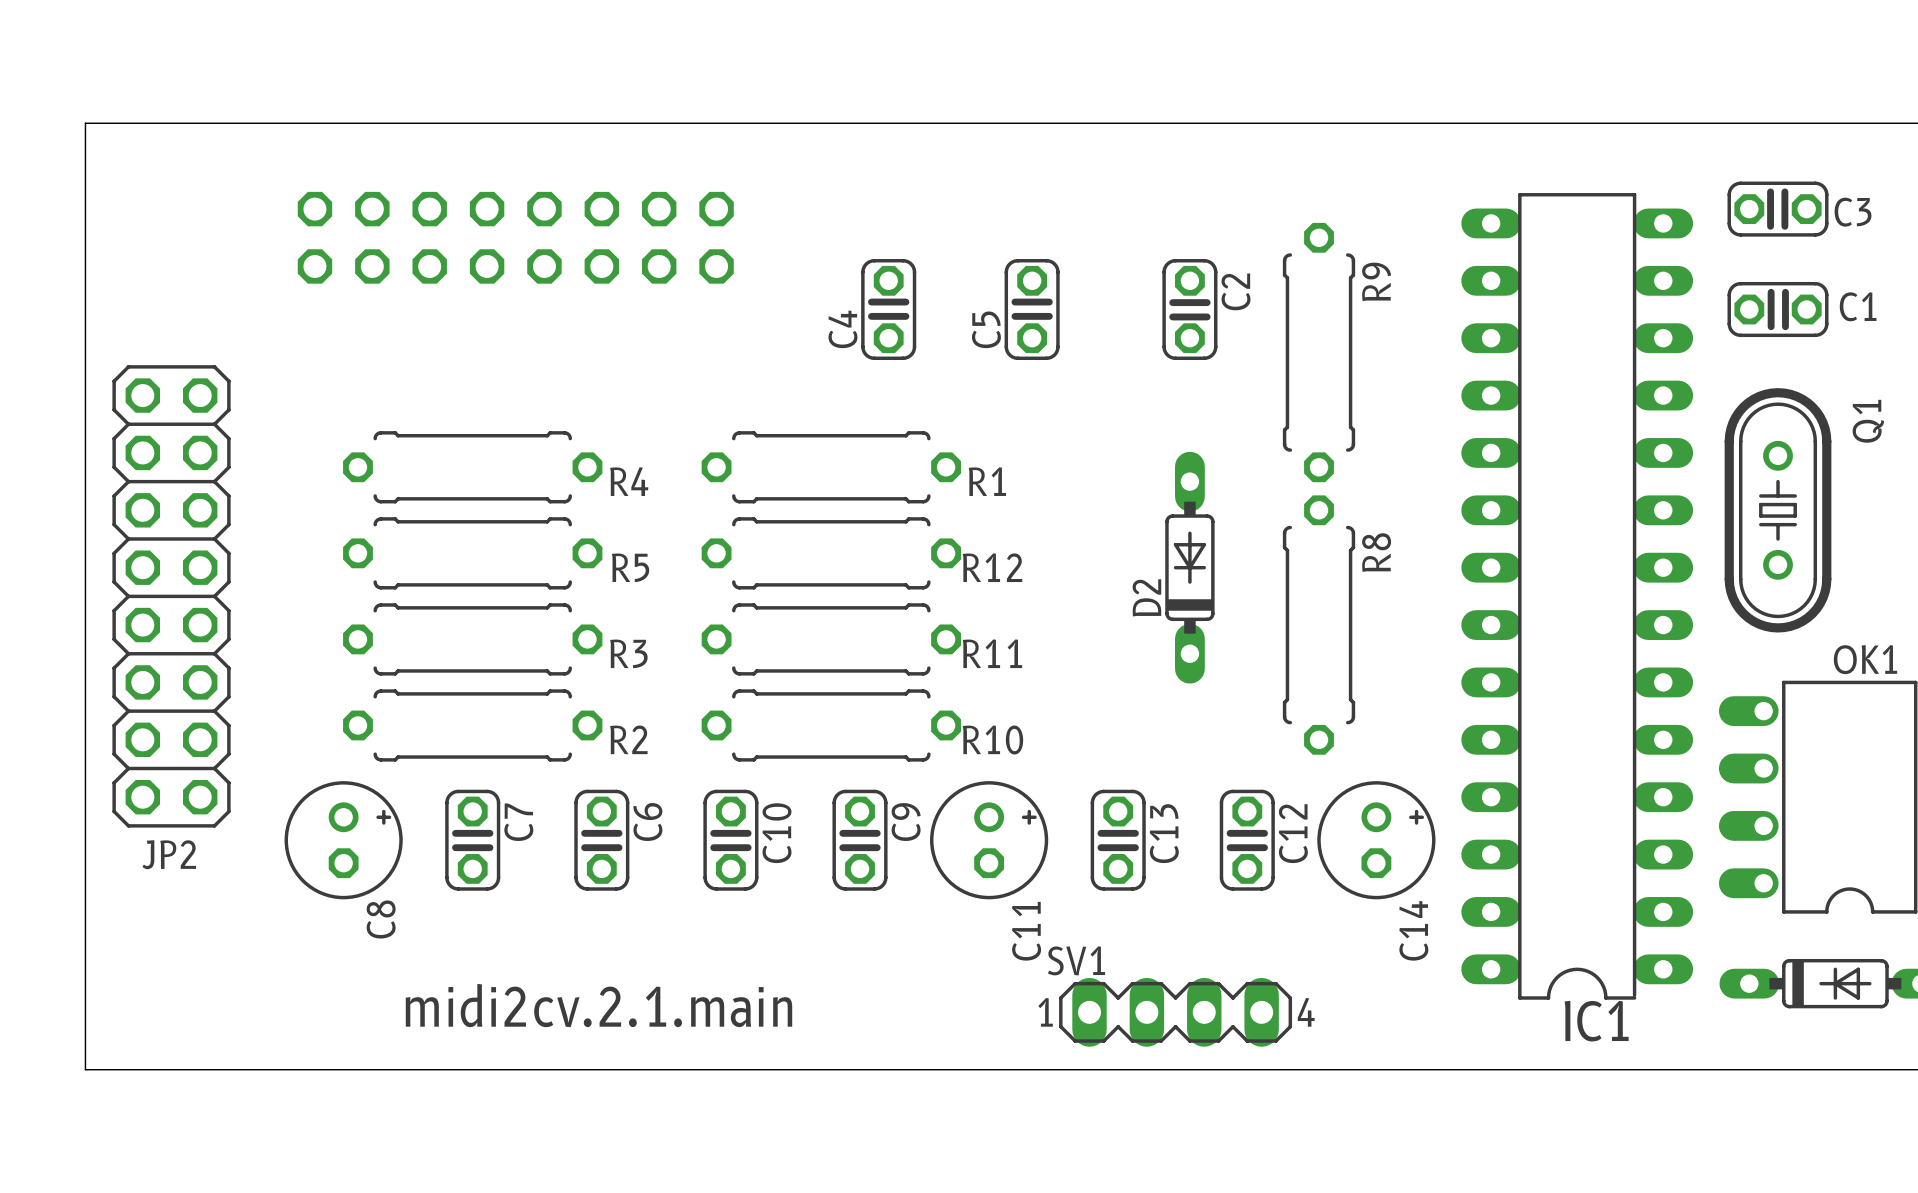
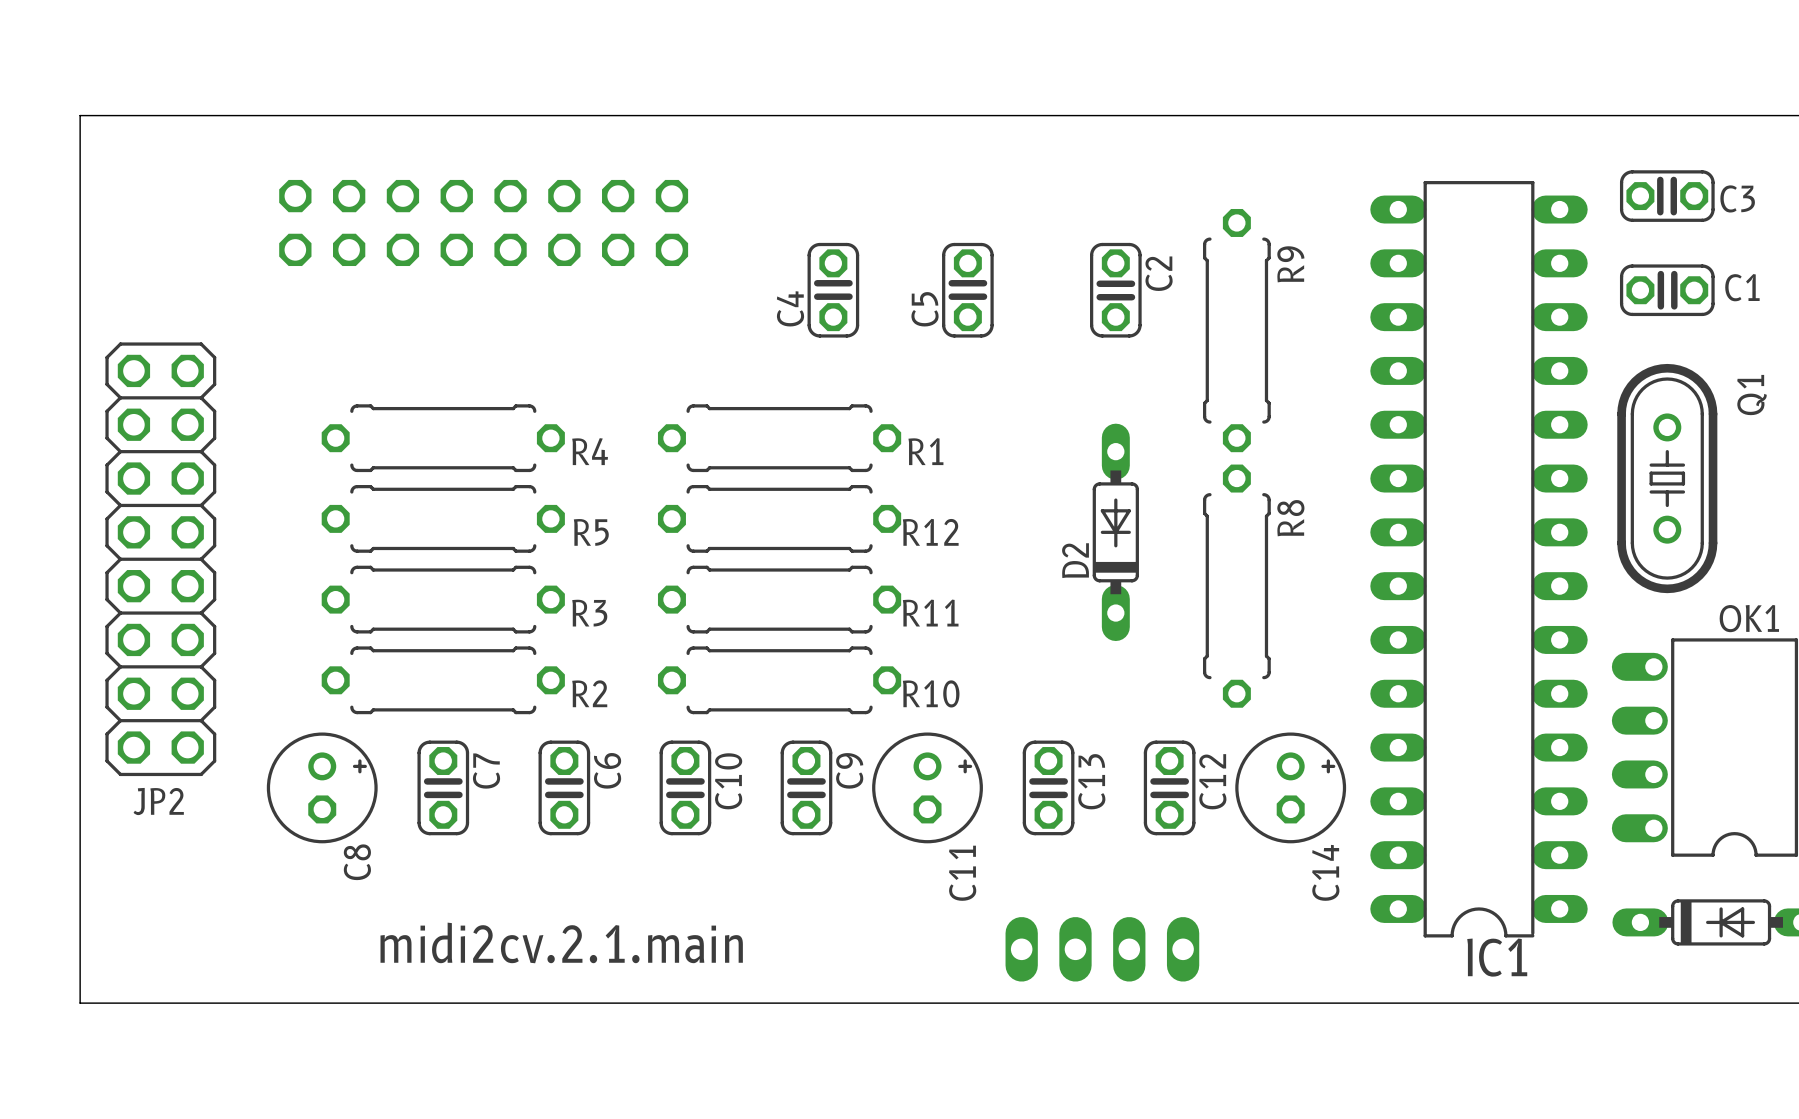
SV1 side: top (1175, 1012) -> bottom (1102, 949)

